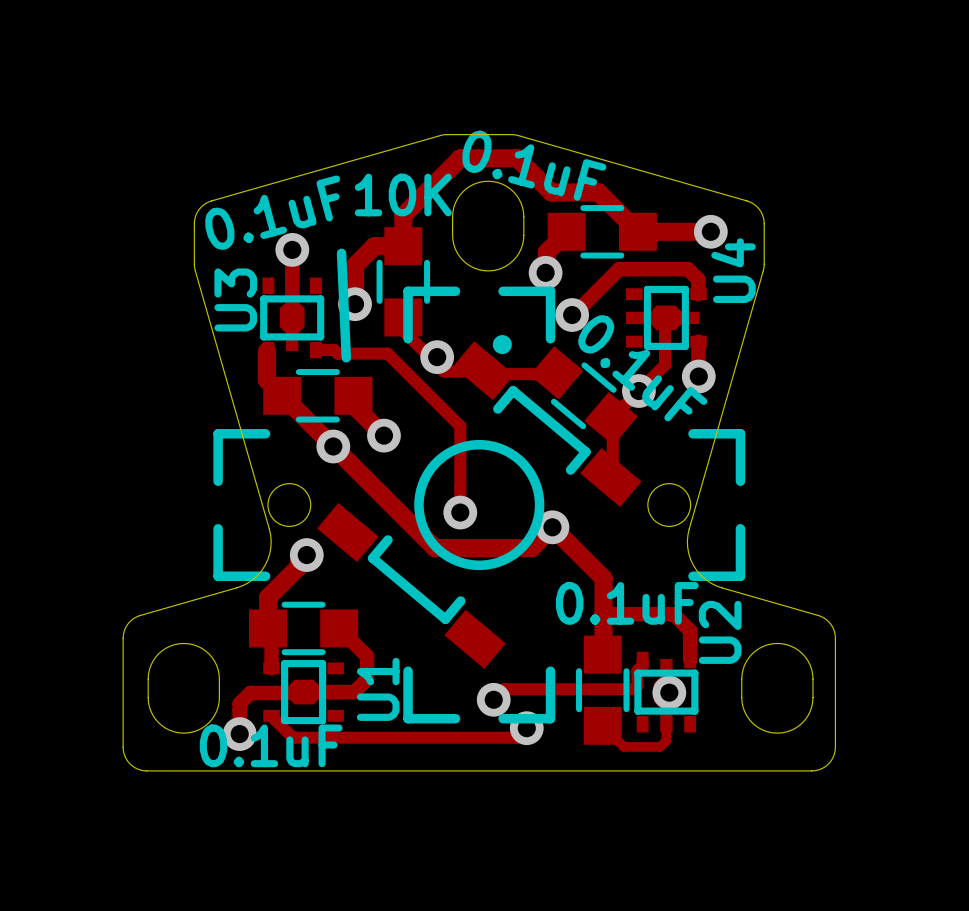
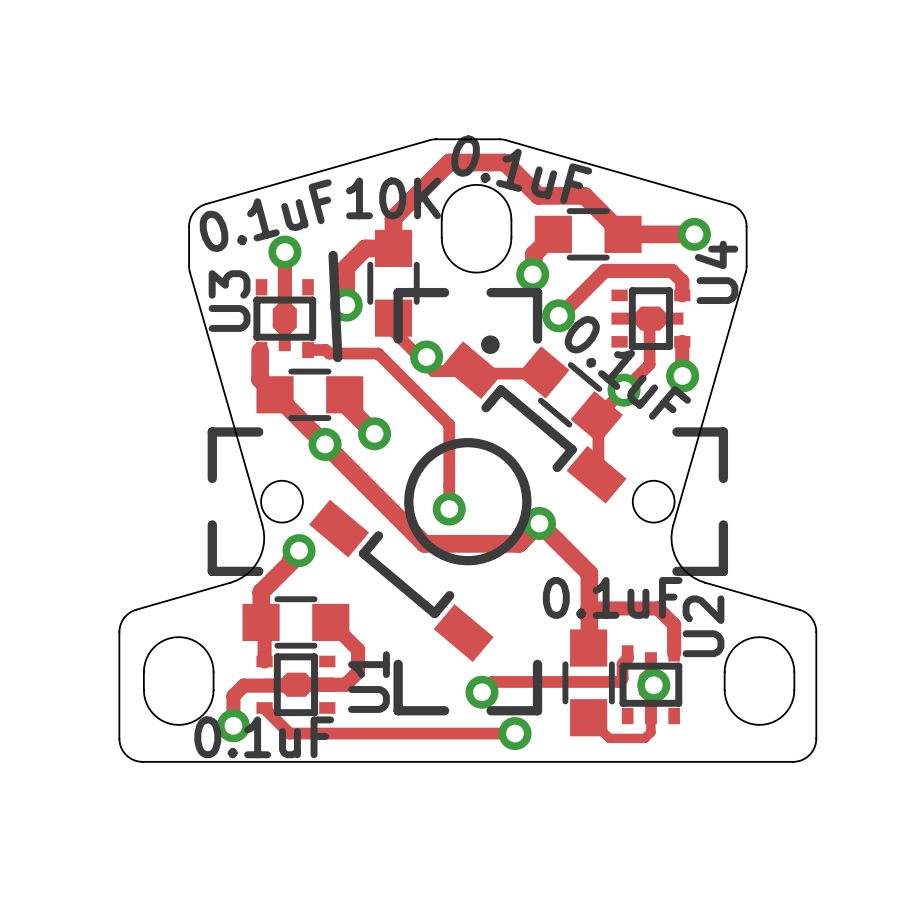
track: (526, 728) (517, 737) (292, 737) -> (515, 733) (289, 733) (285, 729)
via position: (526, 728) -> (515, 733)

